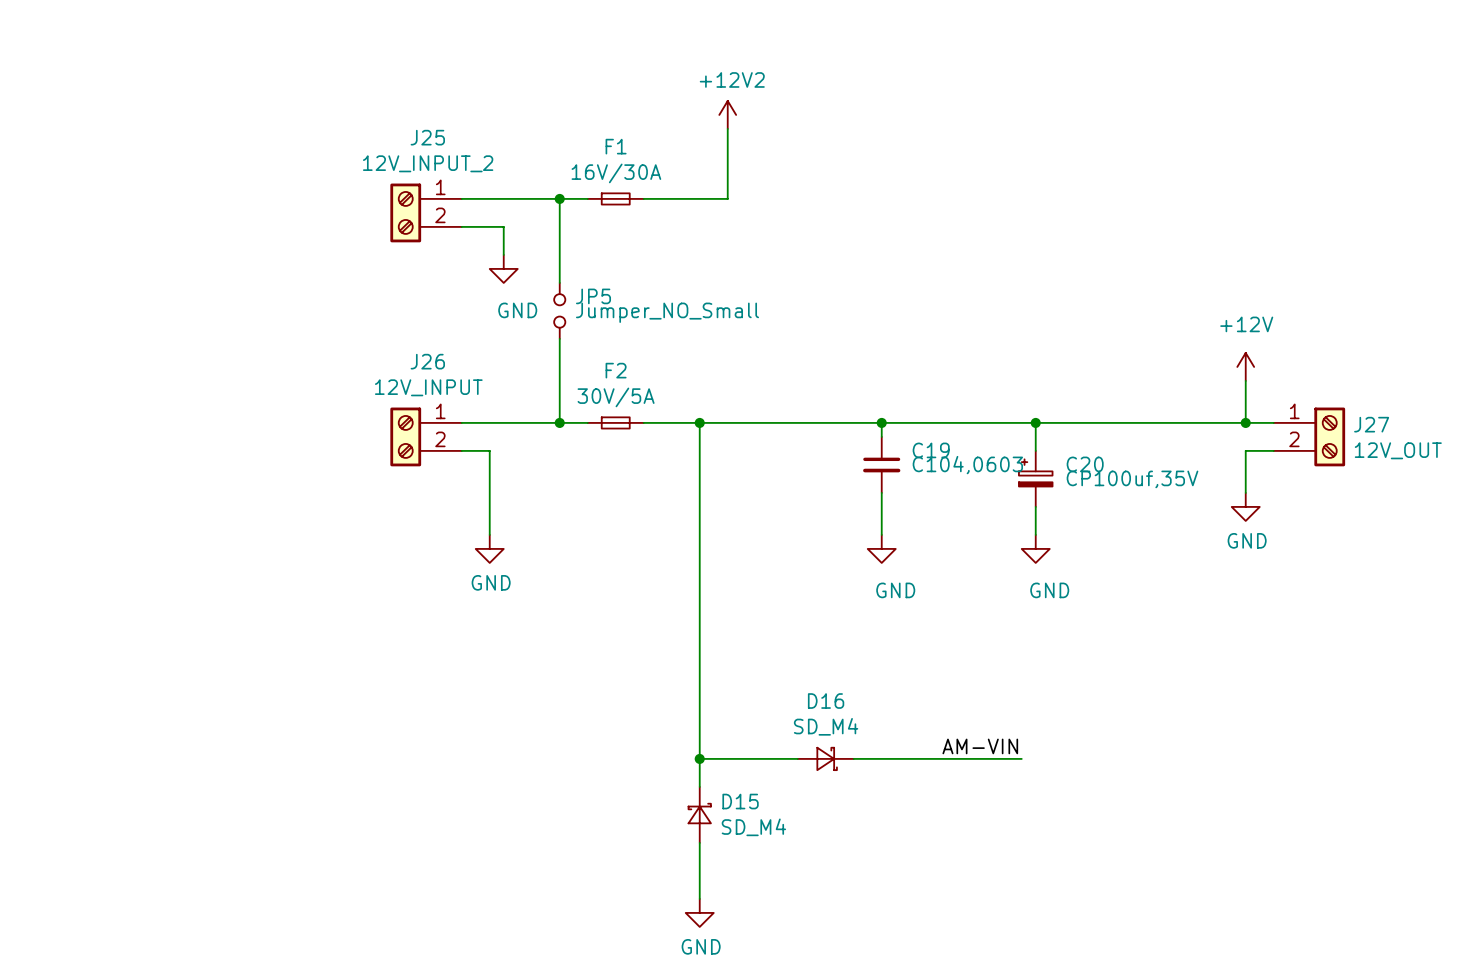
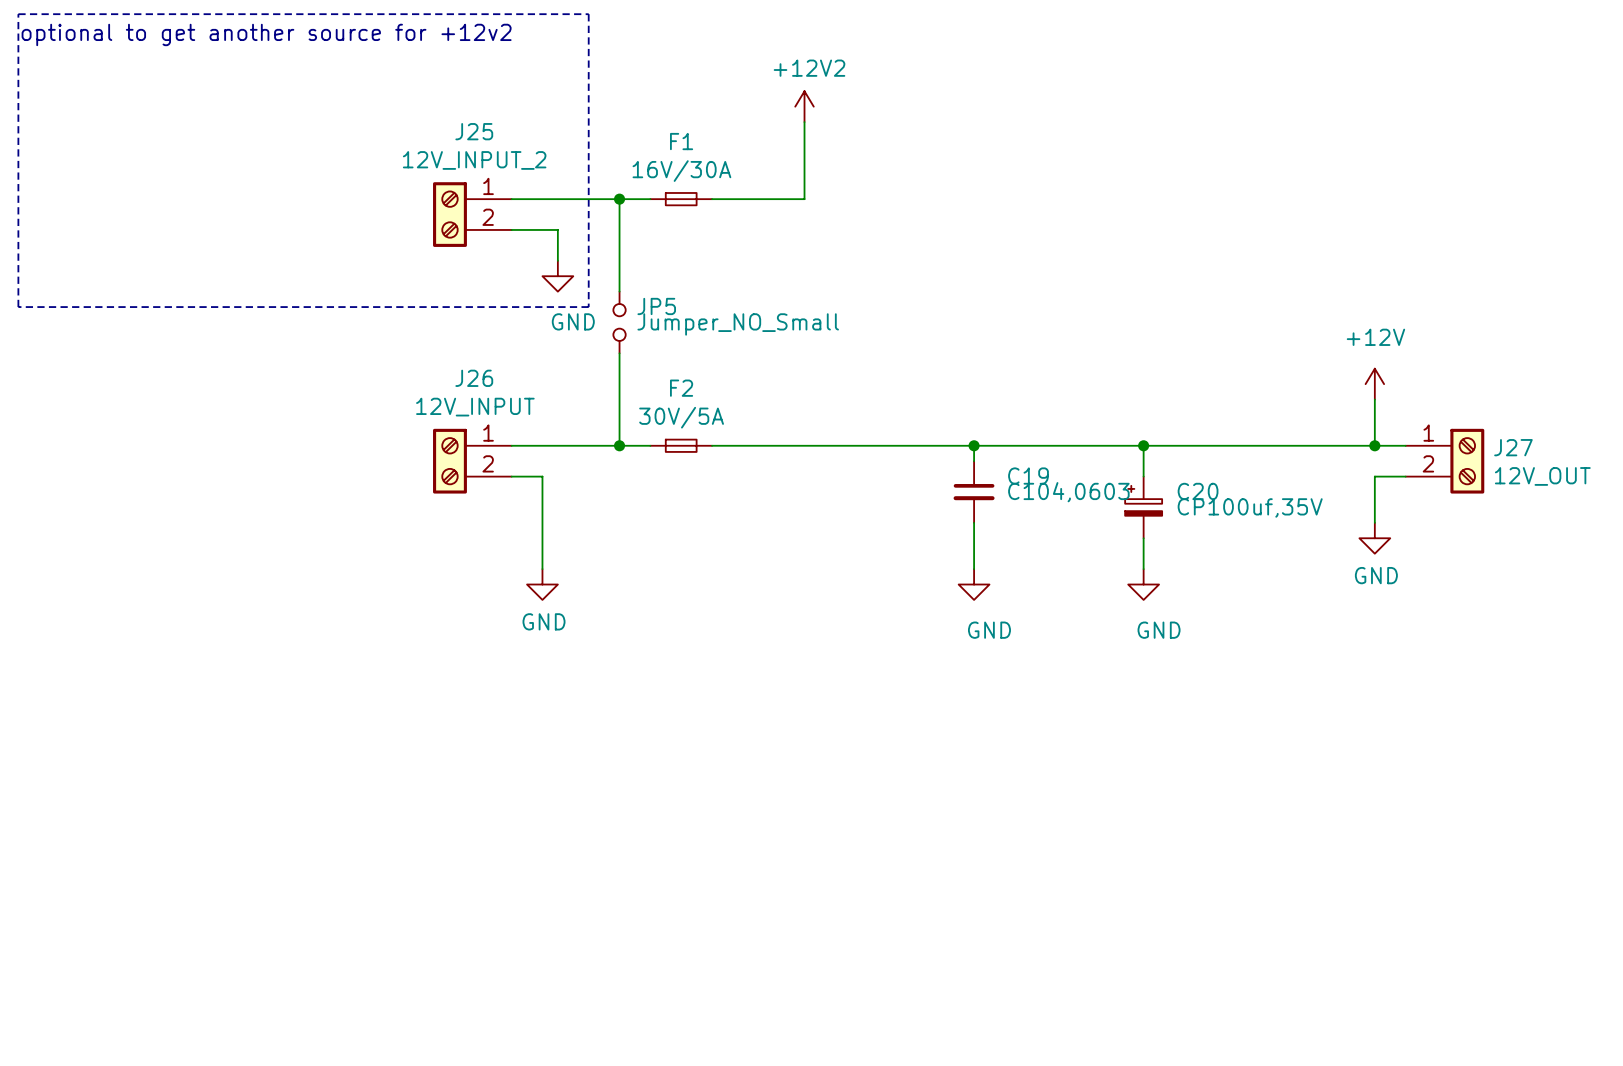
line: none -> (18, 14) (588, 14) (588, 307) (18, 307) (18, 14)
text: none -> optional to get another source for +12v2 (266, 34)
wire: (699, 422) (699, 786) -> none
junction: (699, 422) -> none
label: AM-VIN (980, 746) -> none
wire: (699, 758) (797, 758) -> none
junction: (699, 758) -> none
D16: SD_M4 (825, 758) -> none
wire: (853, 758) (1021, 758) -> none
D15: SD_M4 (699, 814) -> none
wire: (699, 842) (699, 898) -> none
power symbol: GND (699, 912) -> none

